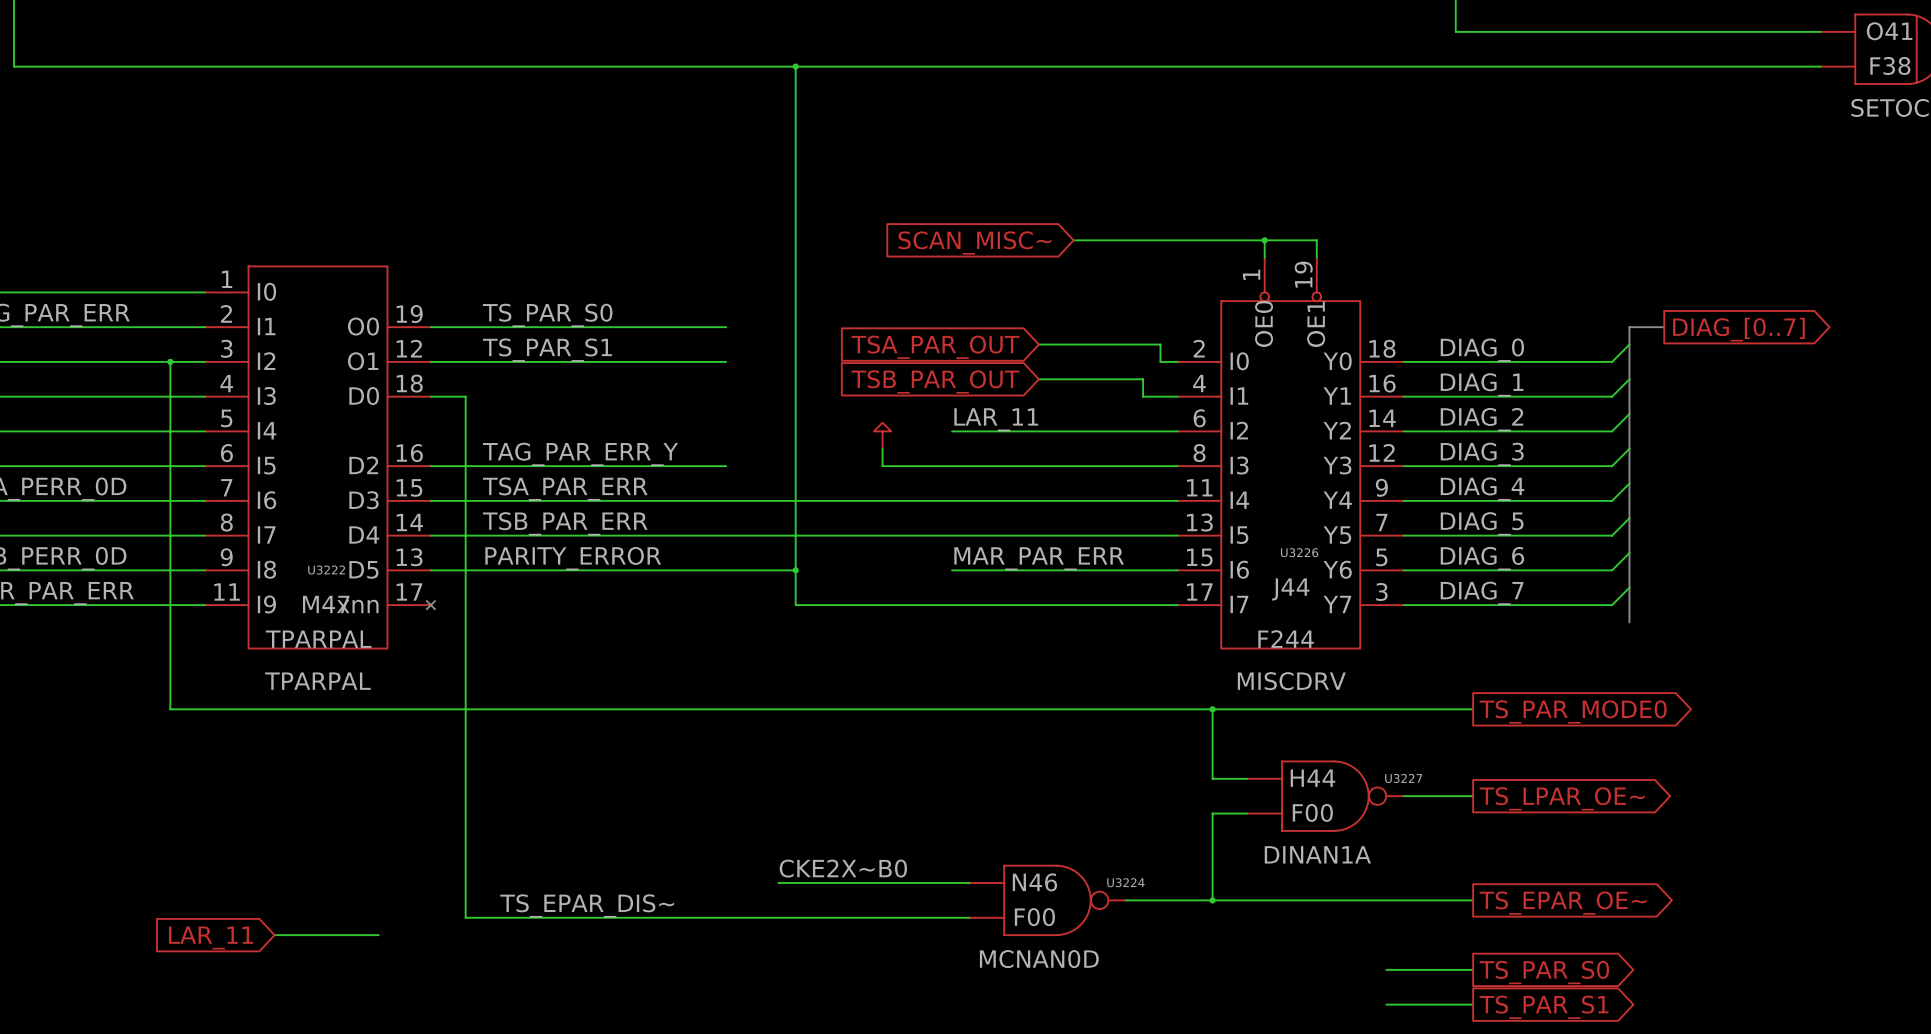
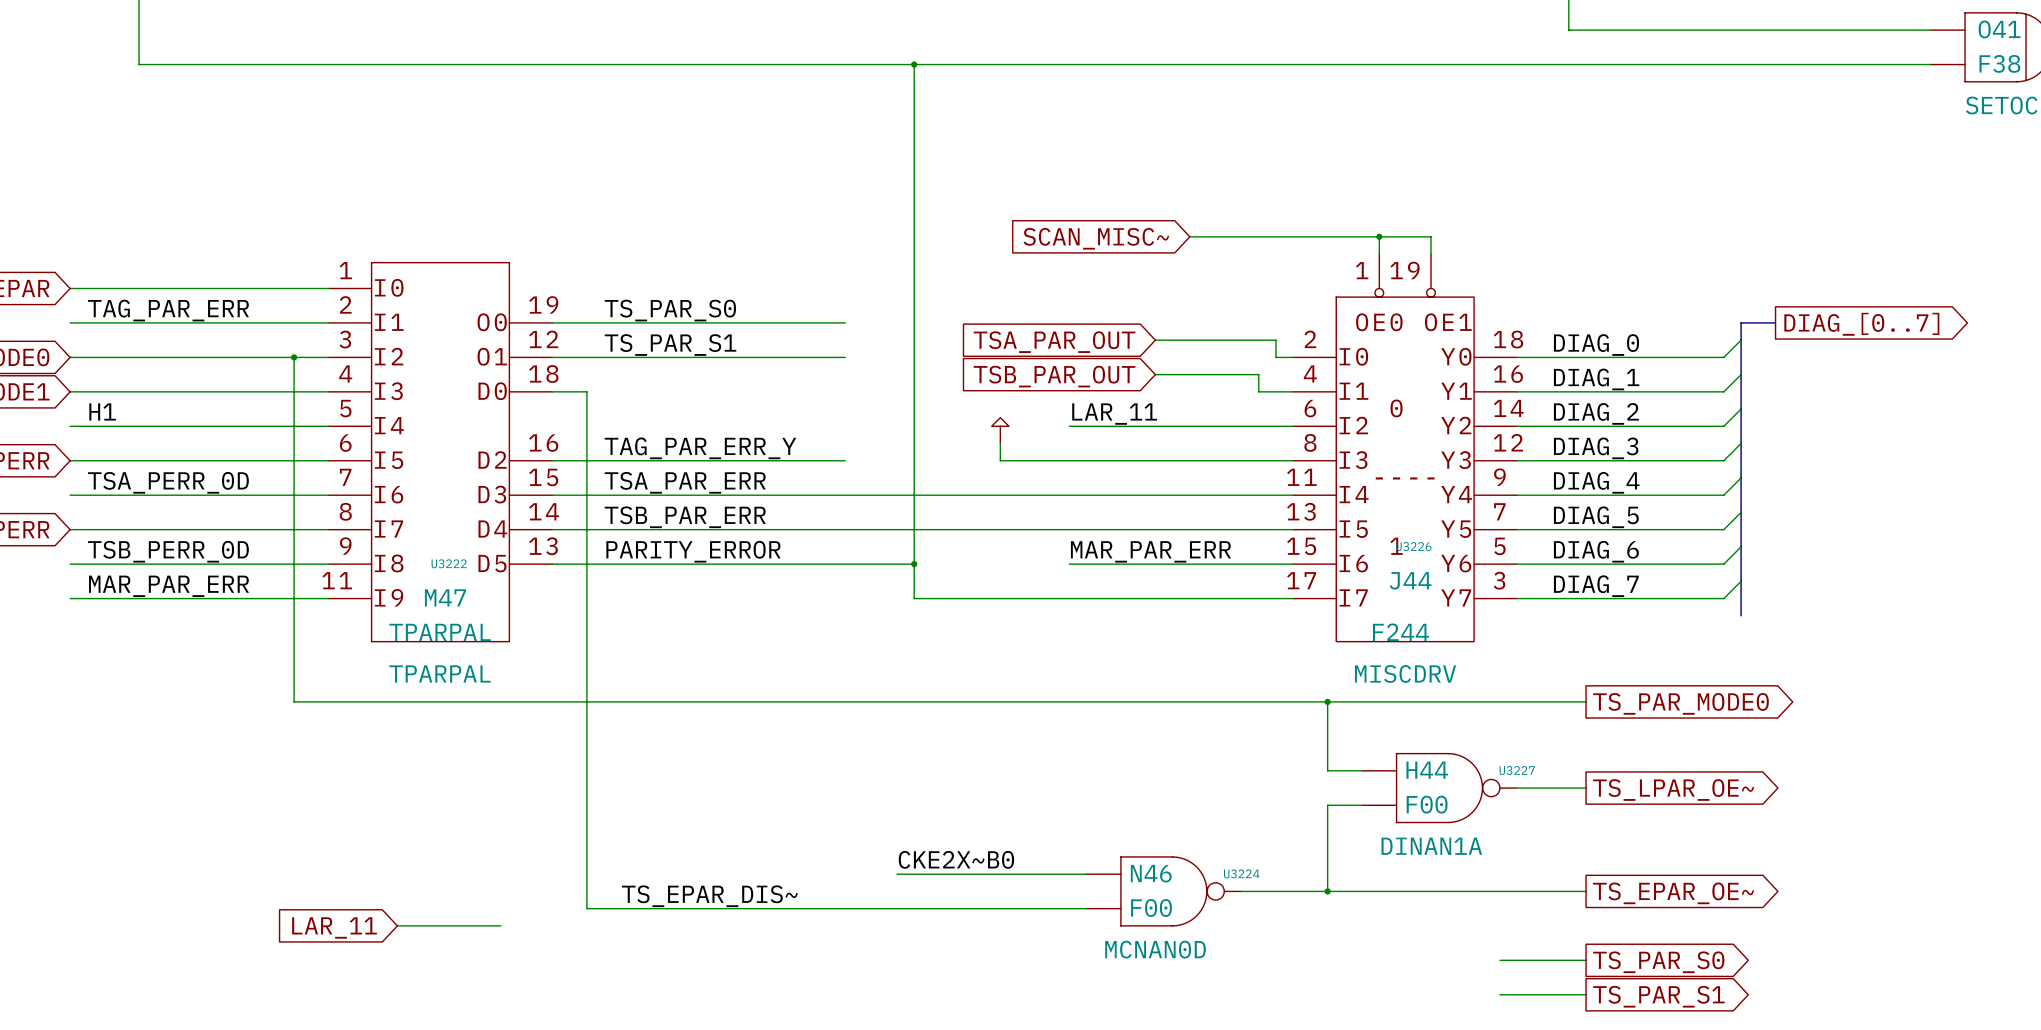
U3226 symbol: [1177, 257, 1404, 649] -> [1293, 254, 1518, 642]
U3222 symbol: [205, 266, 431, 649] -> [328, 262, 553, 642]
no-connect mark: (430, 605) -> none

